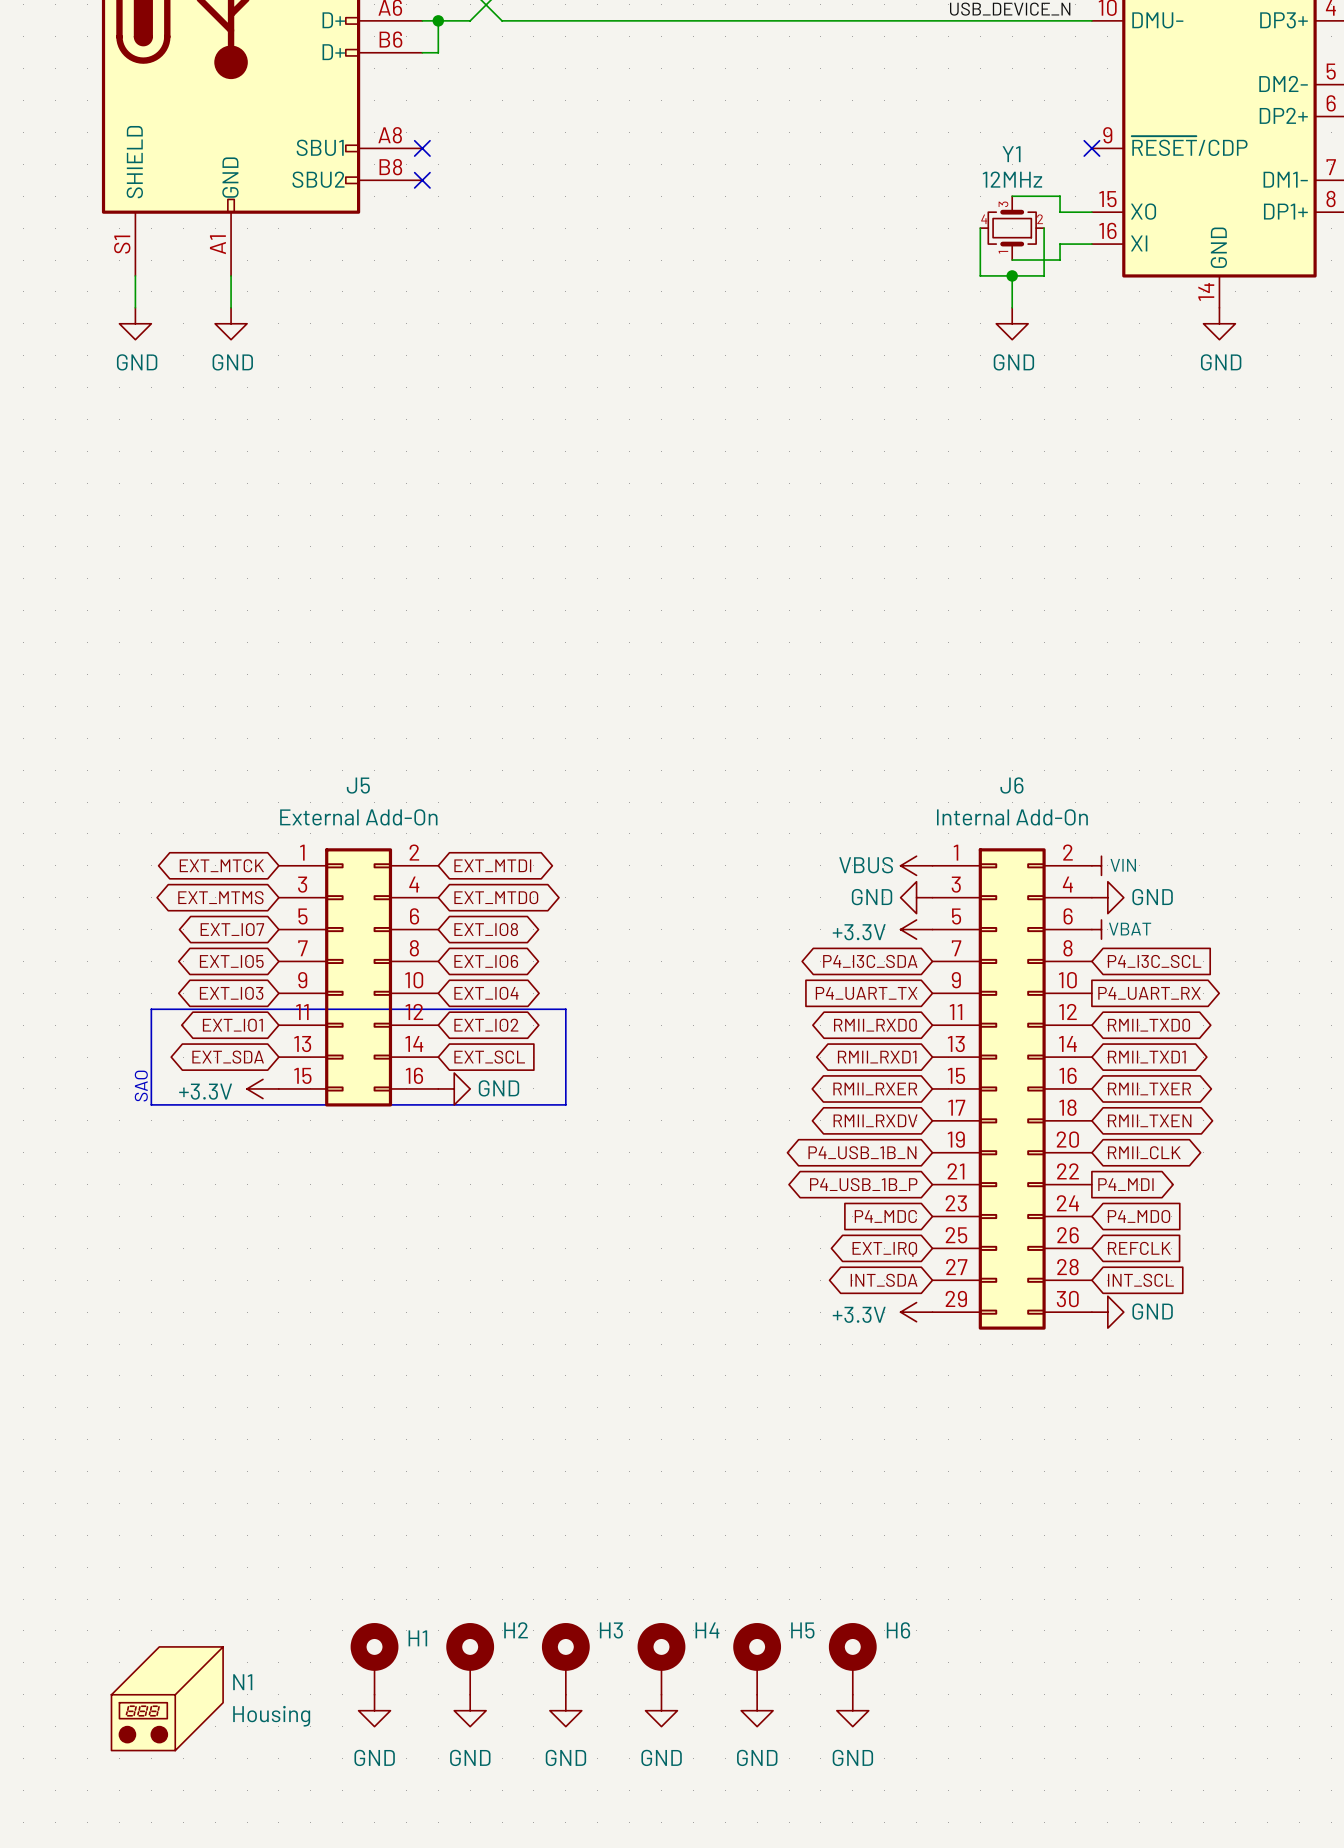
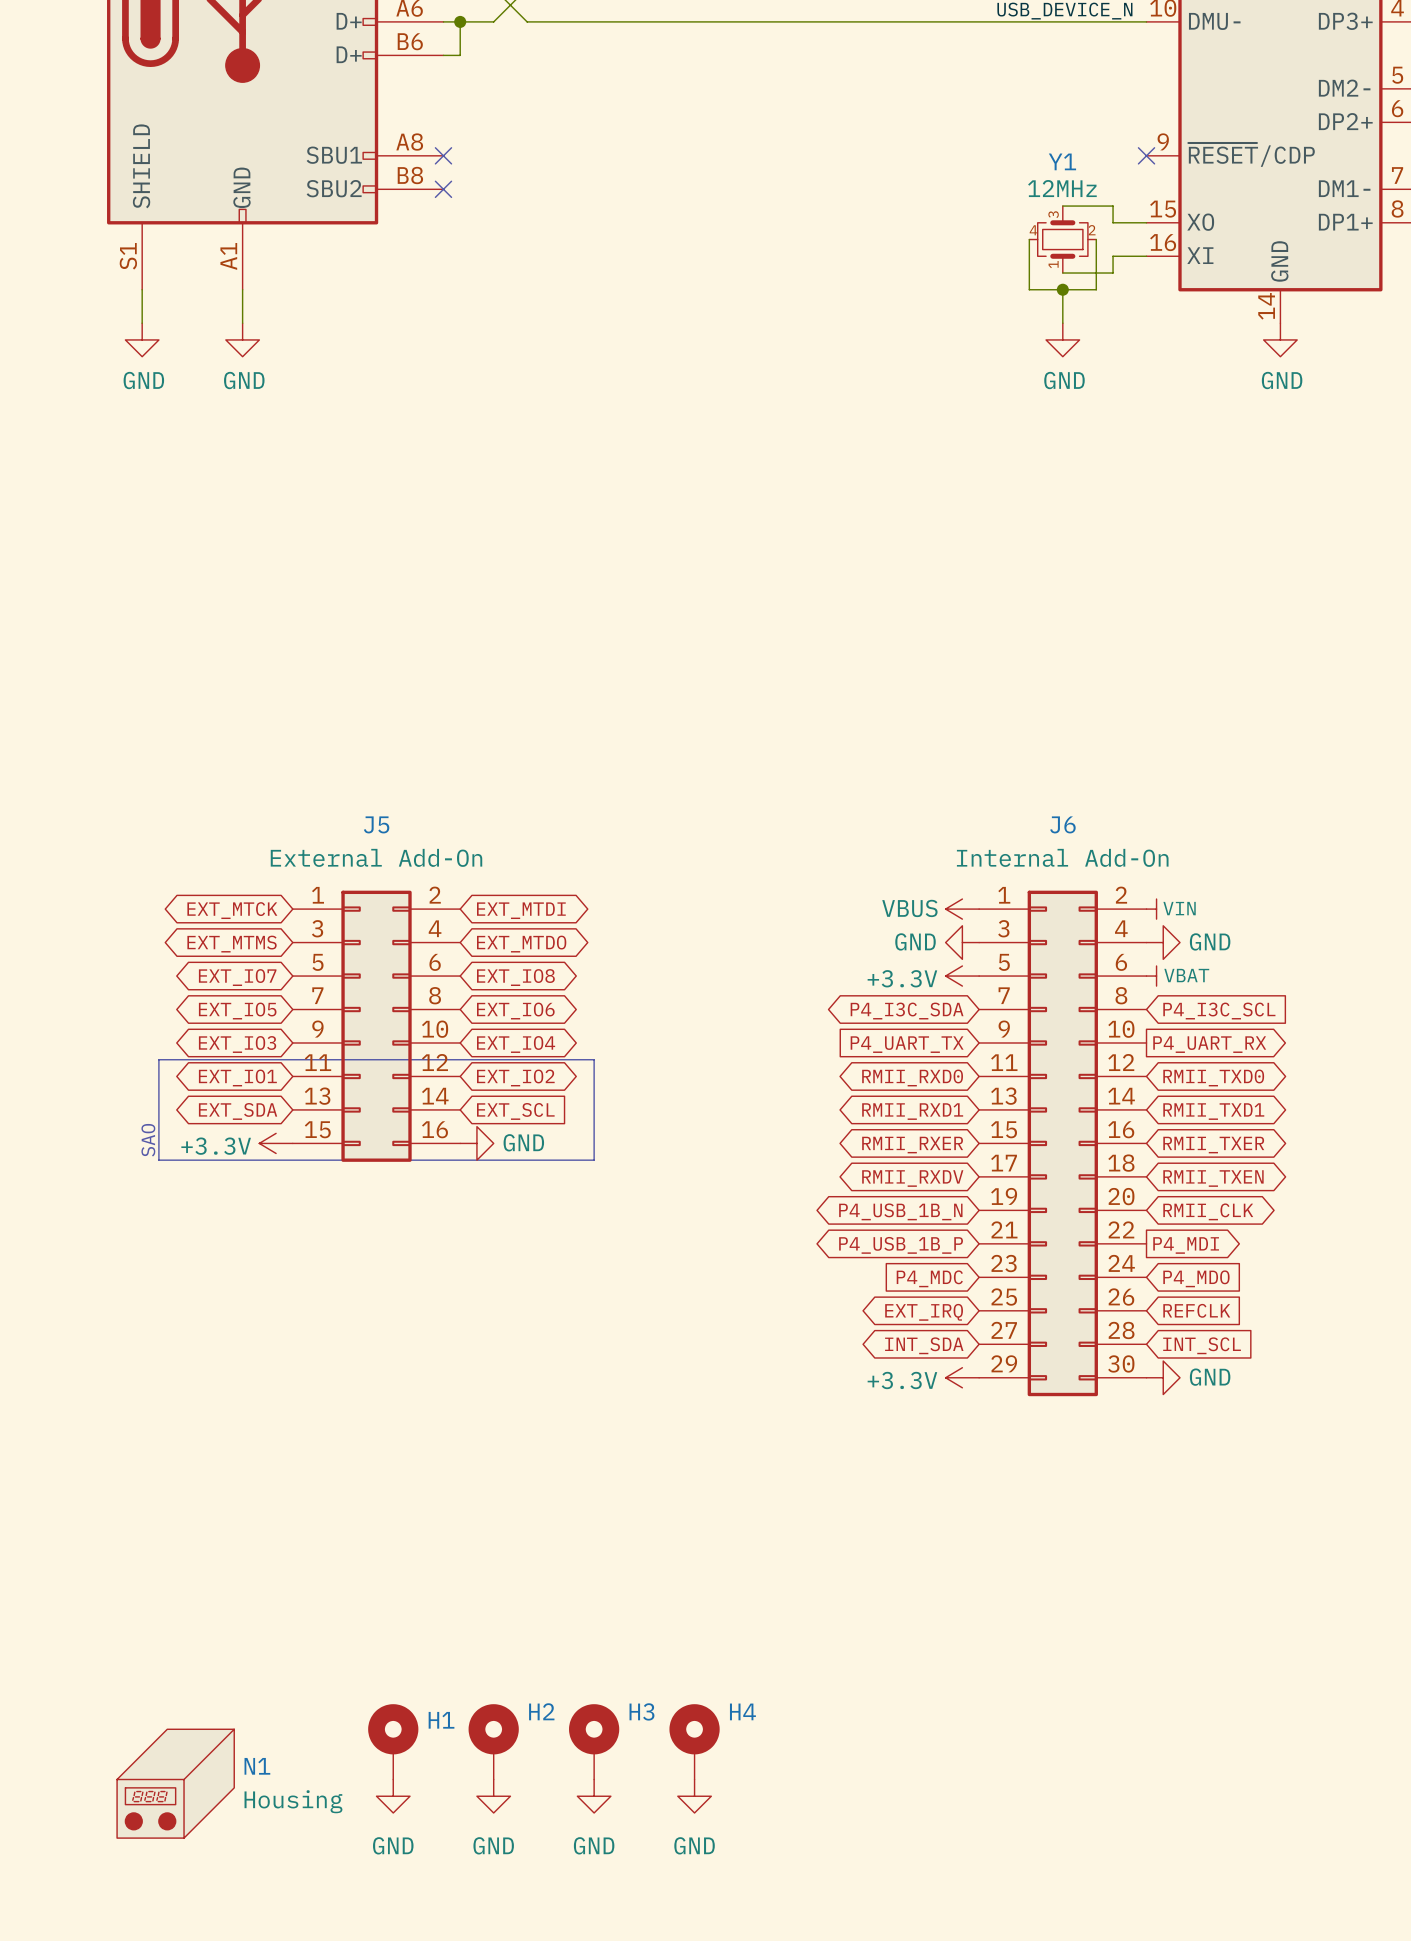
H5: (757, 1658) -> none
H6: (852, 1658) -> none
power symbol: GND (757, 1710) -> none
power symbol: GND (852, 1710) -> none

